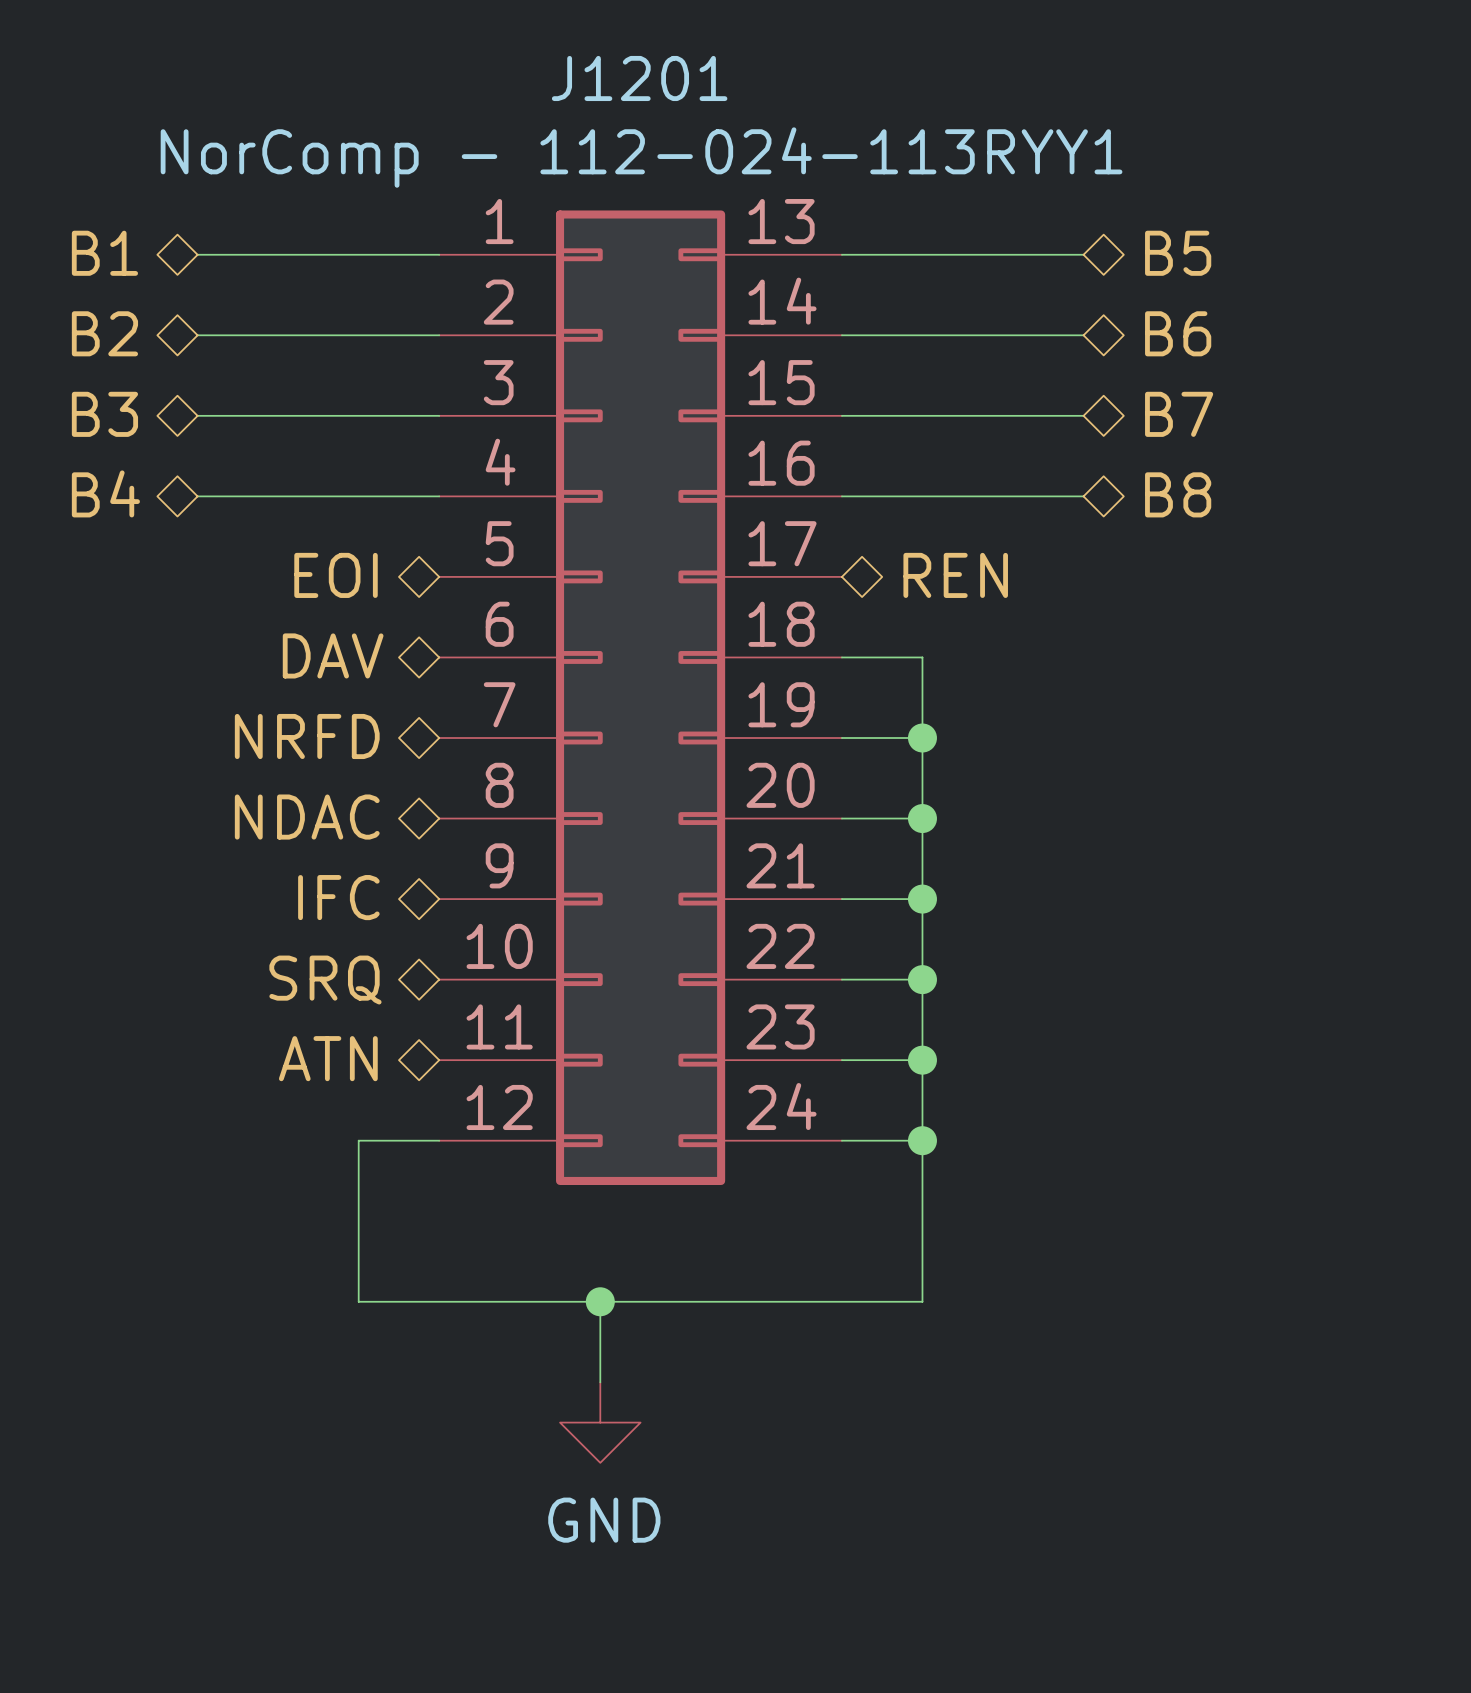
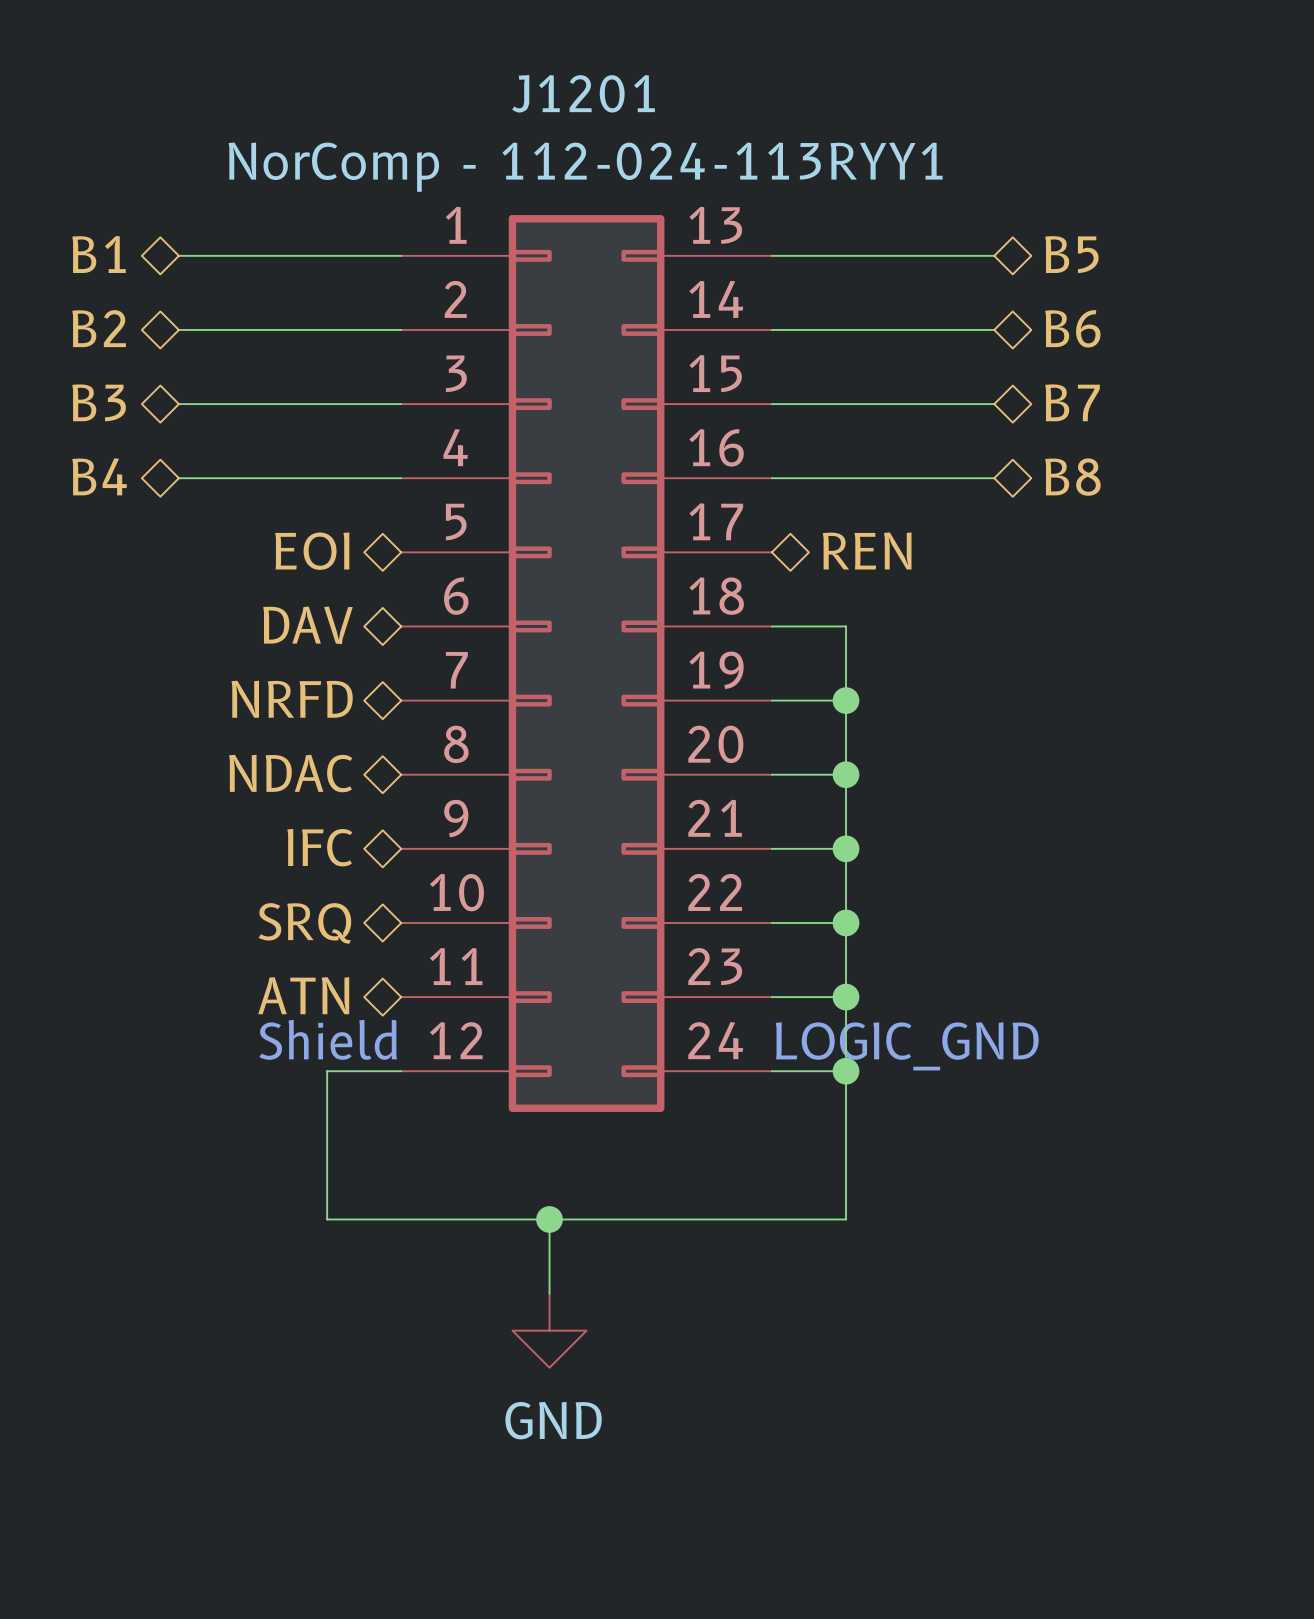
text: none -> Shield (328, 1039)
text: none -> LOGIC_GND (907, 1046)

